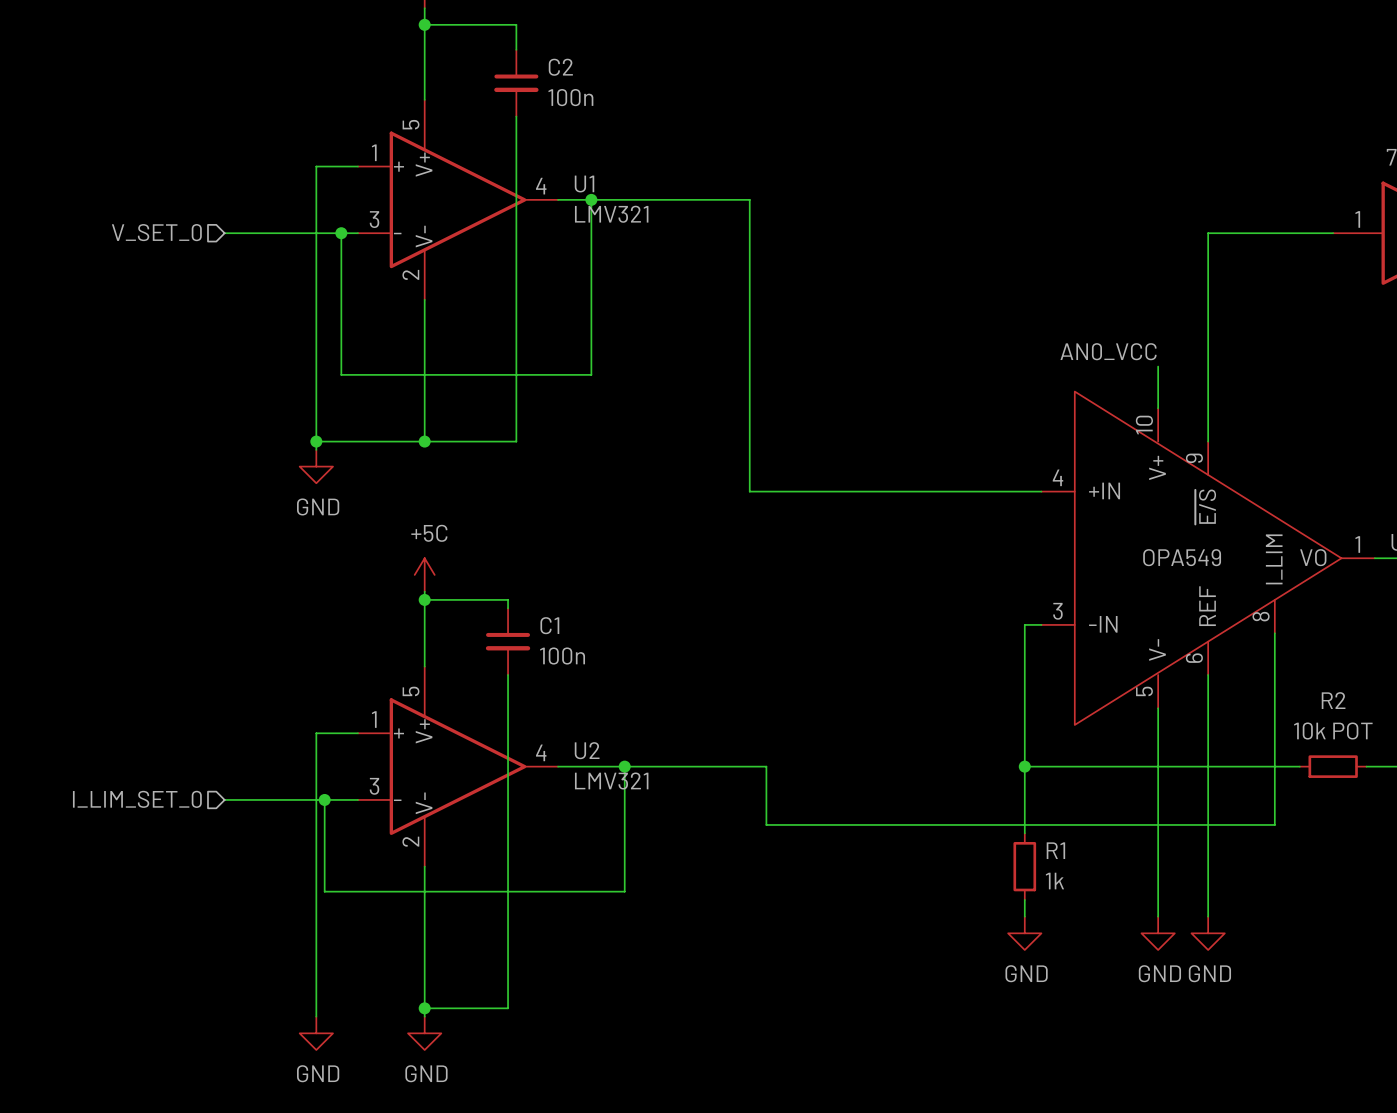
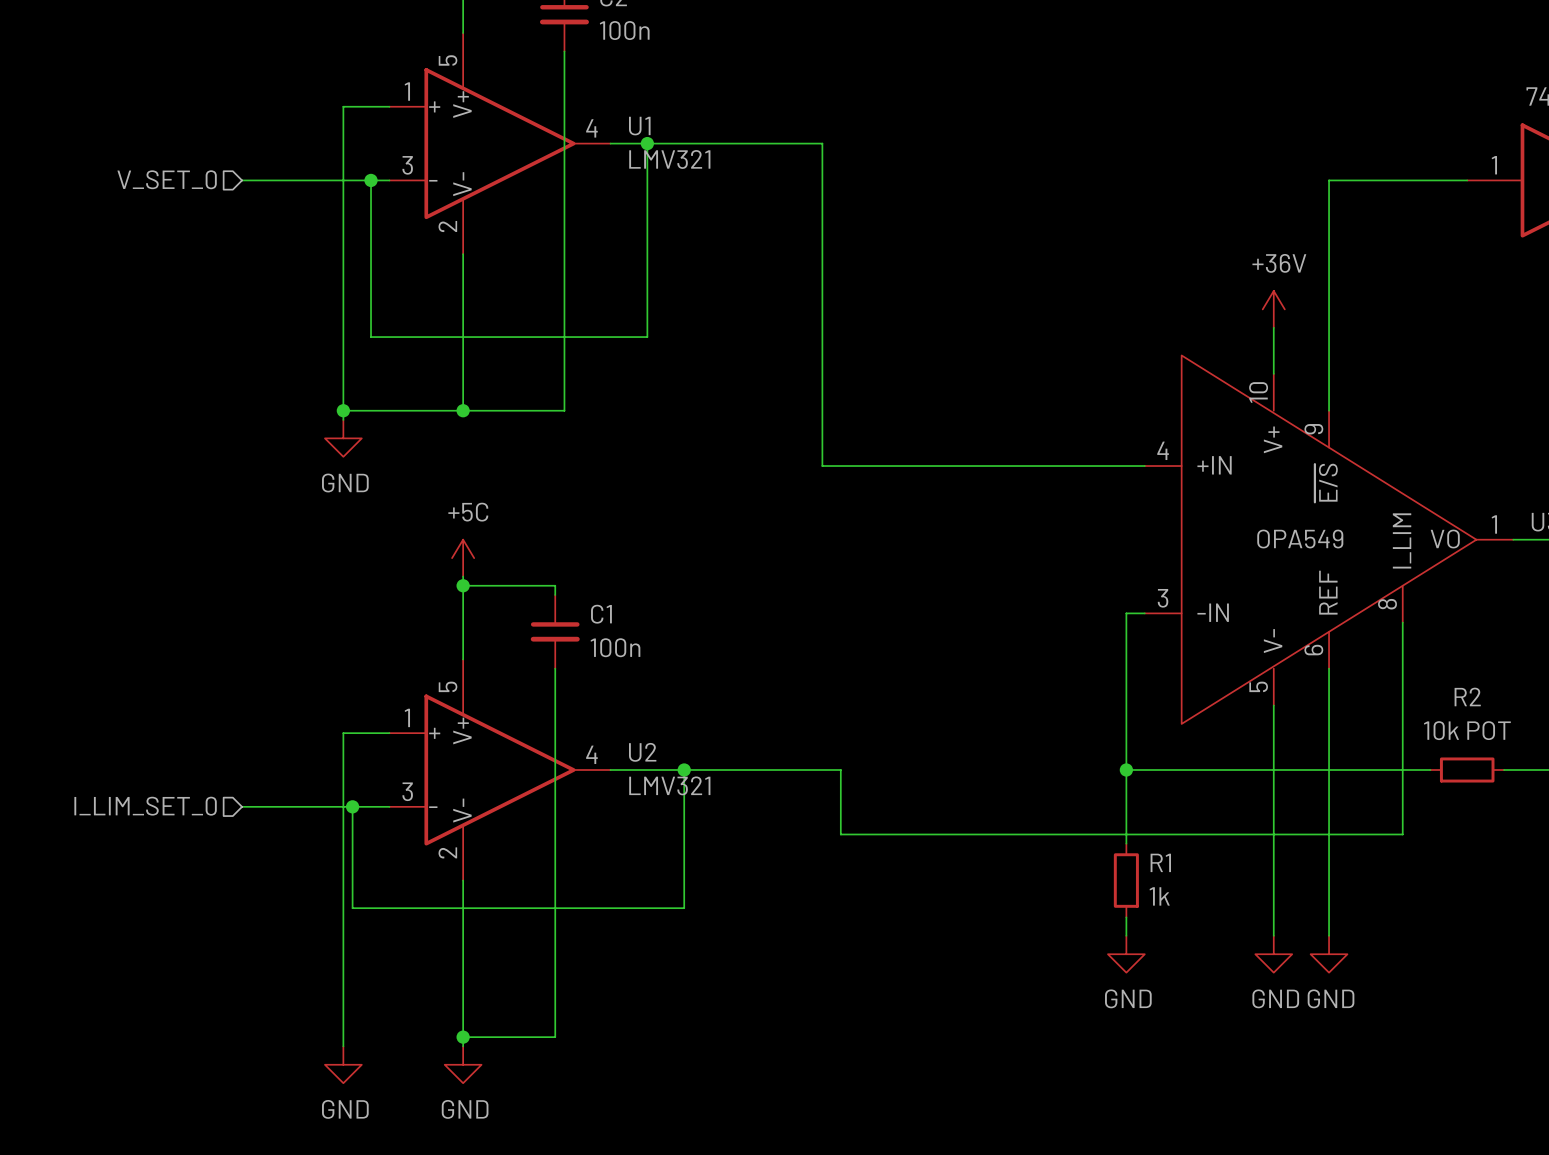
power symbol: none -> +36V (1273, 309)
label: AN0_VCC (1108, 351) -> none

